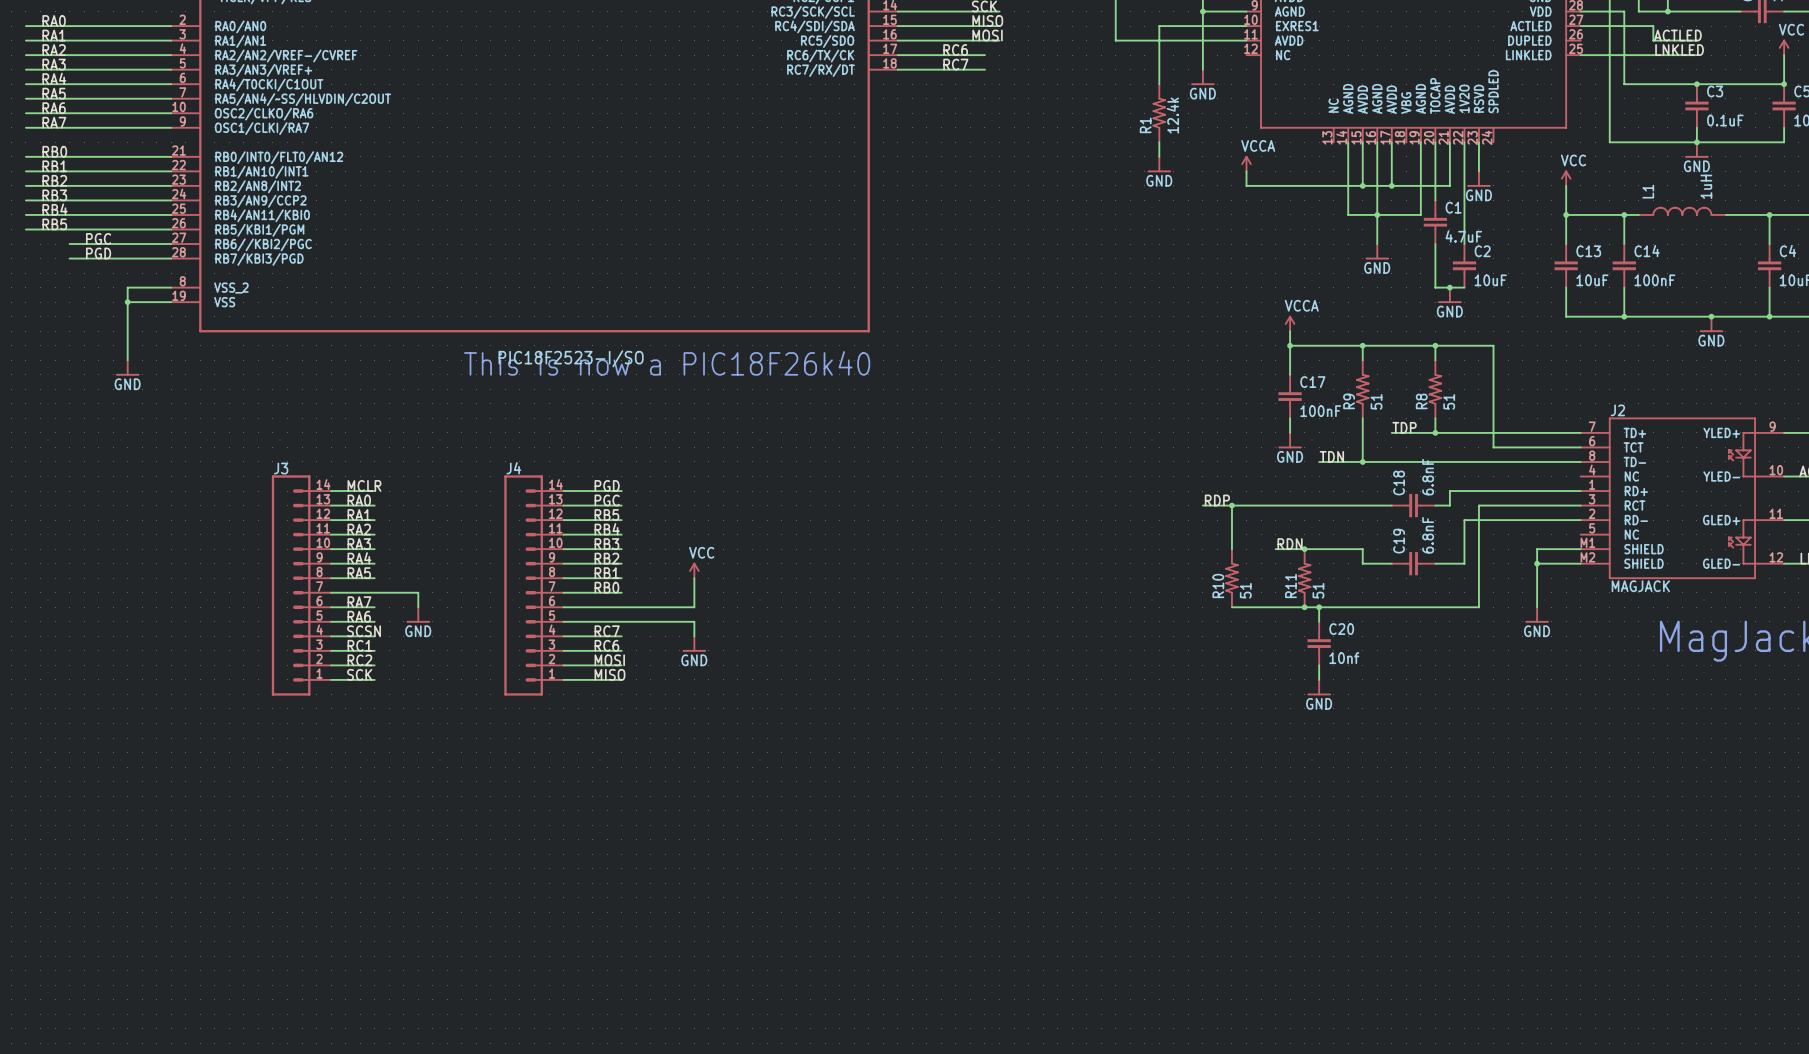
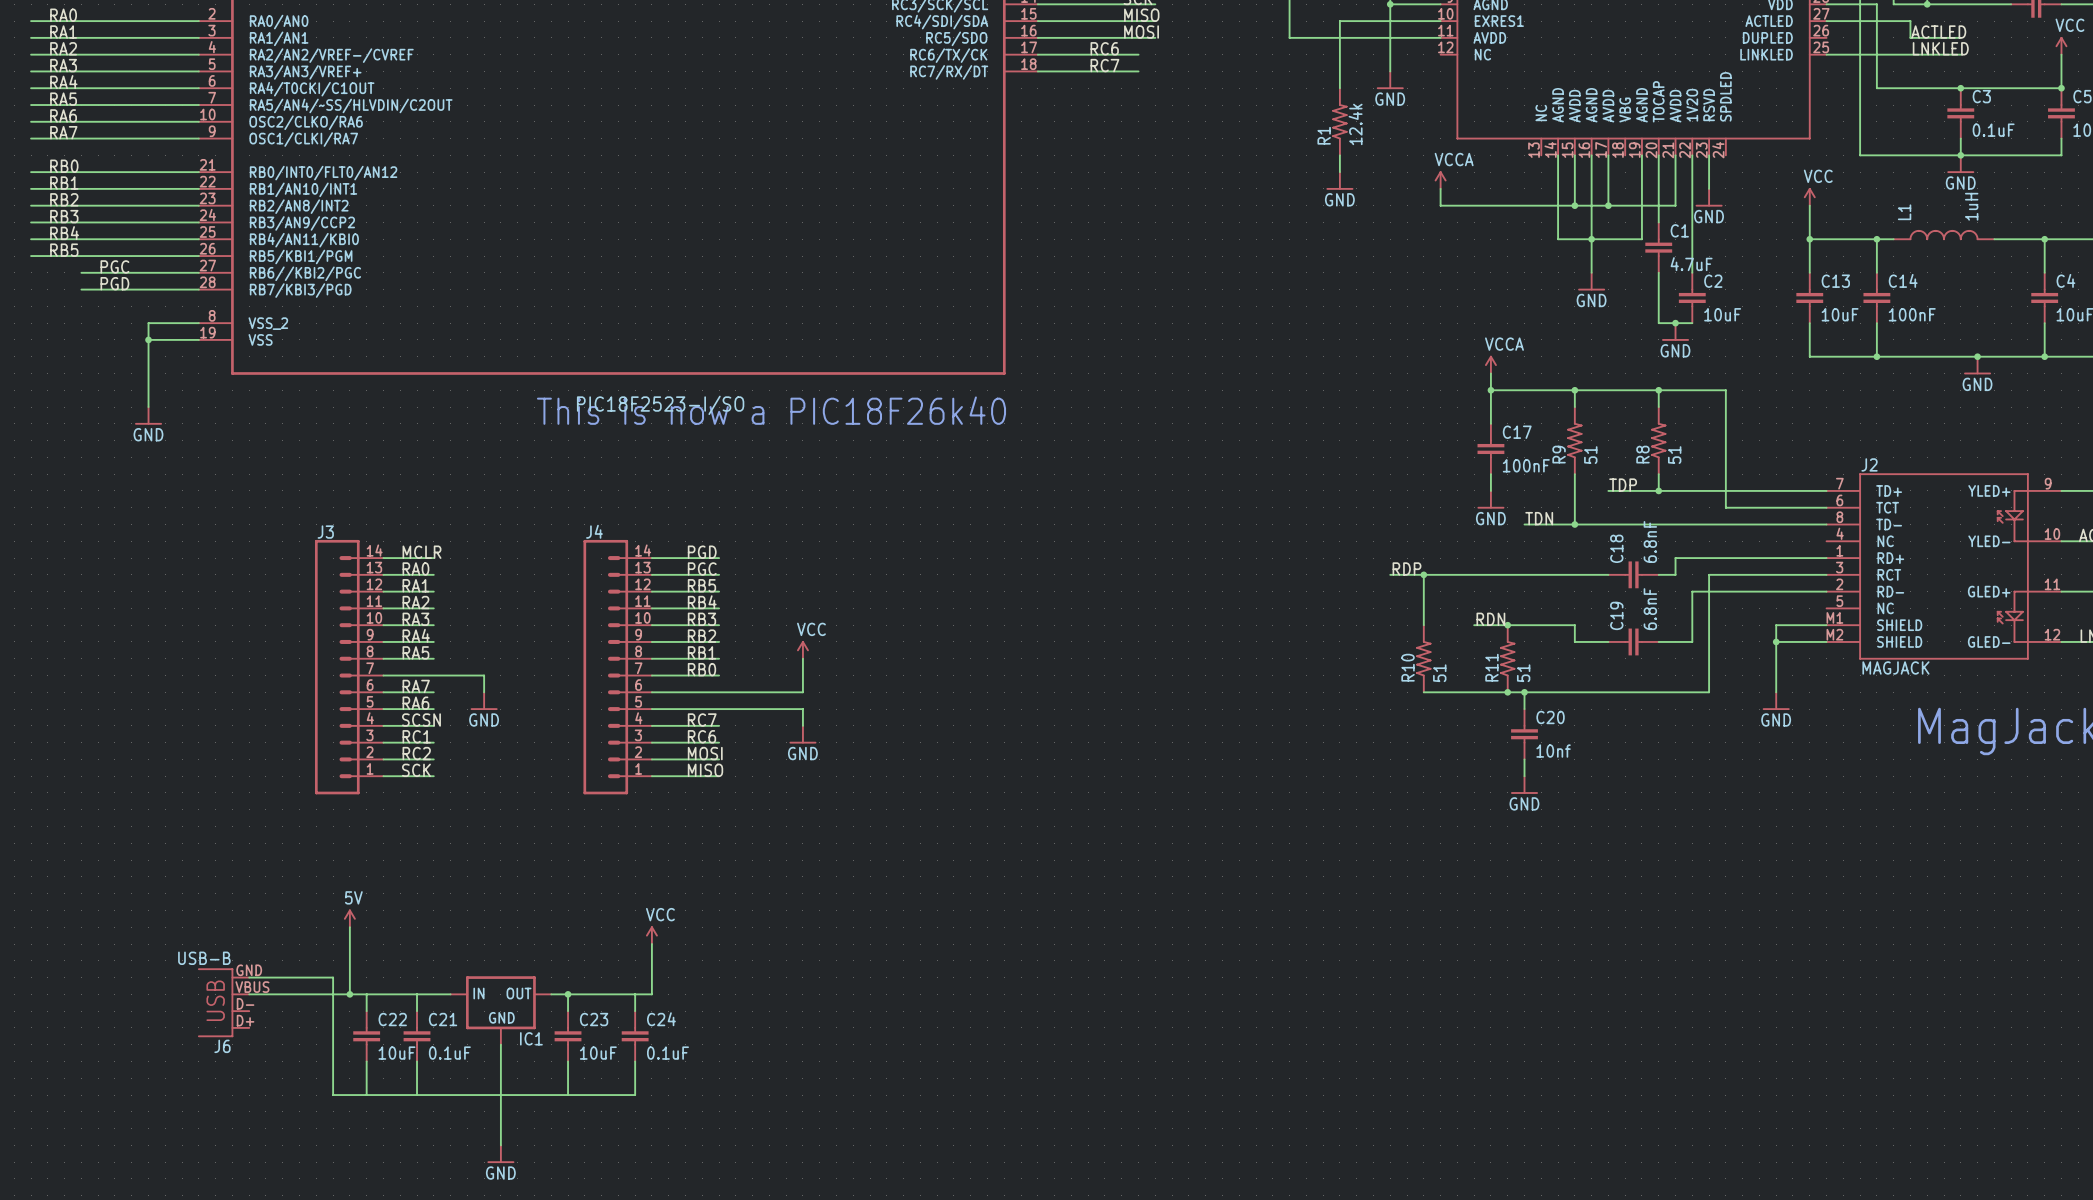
power symbol: none -> 5V (349, 918)
wire: none -> (349, 927) (349, 994)
power symbol: none -> VCC (651, 935)
wire: none -> (651, 944) (651, 994) (551, 994)
wire: none -> (249, 977) (333, 977) (333, 1095) (635, 1095) (635, 1061)
wire: none -> (249, 994) (450, 994)
junction: none -> (349, 994)
wire: none -> (366, 994) (366, 1011)
wire: none -> (417, 994) (417, 1011)
wire: none -> (568, 994) (568, 1011)
junction: none -> (568, 994)
wire: none -> (635, 994) (635, 1011)
J6: none -> USB-B (223, 1002)
IC1: none -> (500, 1010)
C22: none -> 10uF (366, 1036)
C21: none -> 0.1uF (417, 1036)
C23: none -> 10uF (568, 1036)
C24: none -> 0.1uF (635, 1036)
wire: none -> (500, 1044) (500, 1145)
wire: none -> (366, 1061) (366, 1095)
wire: none -> (417, 1061) (417, 1095)
wire: none -> (568, 1061) (568, 1095)
power symbol: none -> GND (500, 1154)

